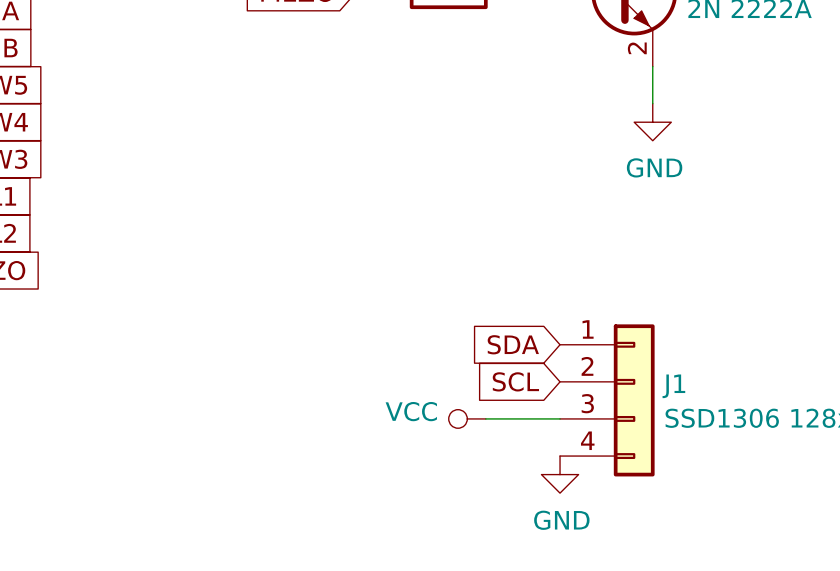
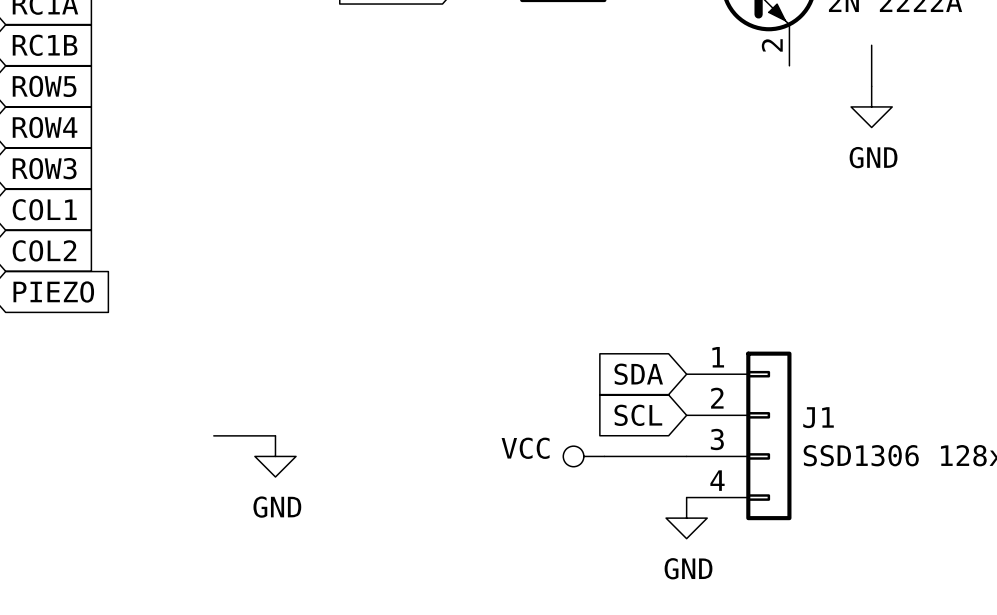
wire: (652, 66) (652, 103) -> (871, 45) (871, 86)
power symbol position: GND (652, 122) -> GND (871, 106)
wire: none -> (213, 435) (275, 435)
power symbol: none -> GND (275, 456)

